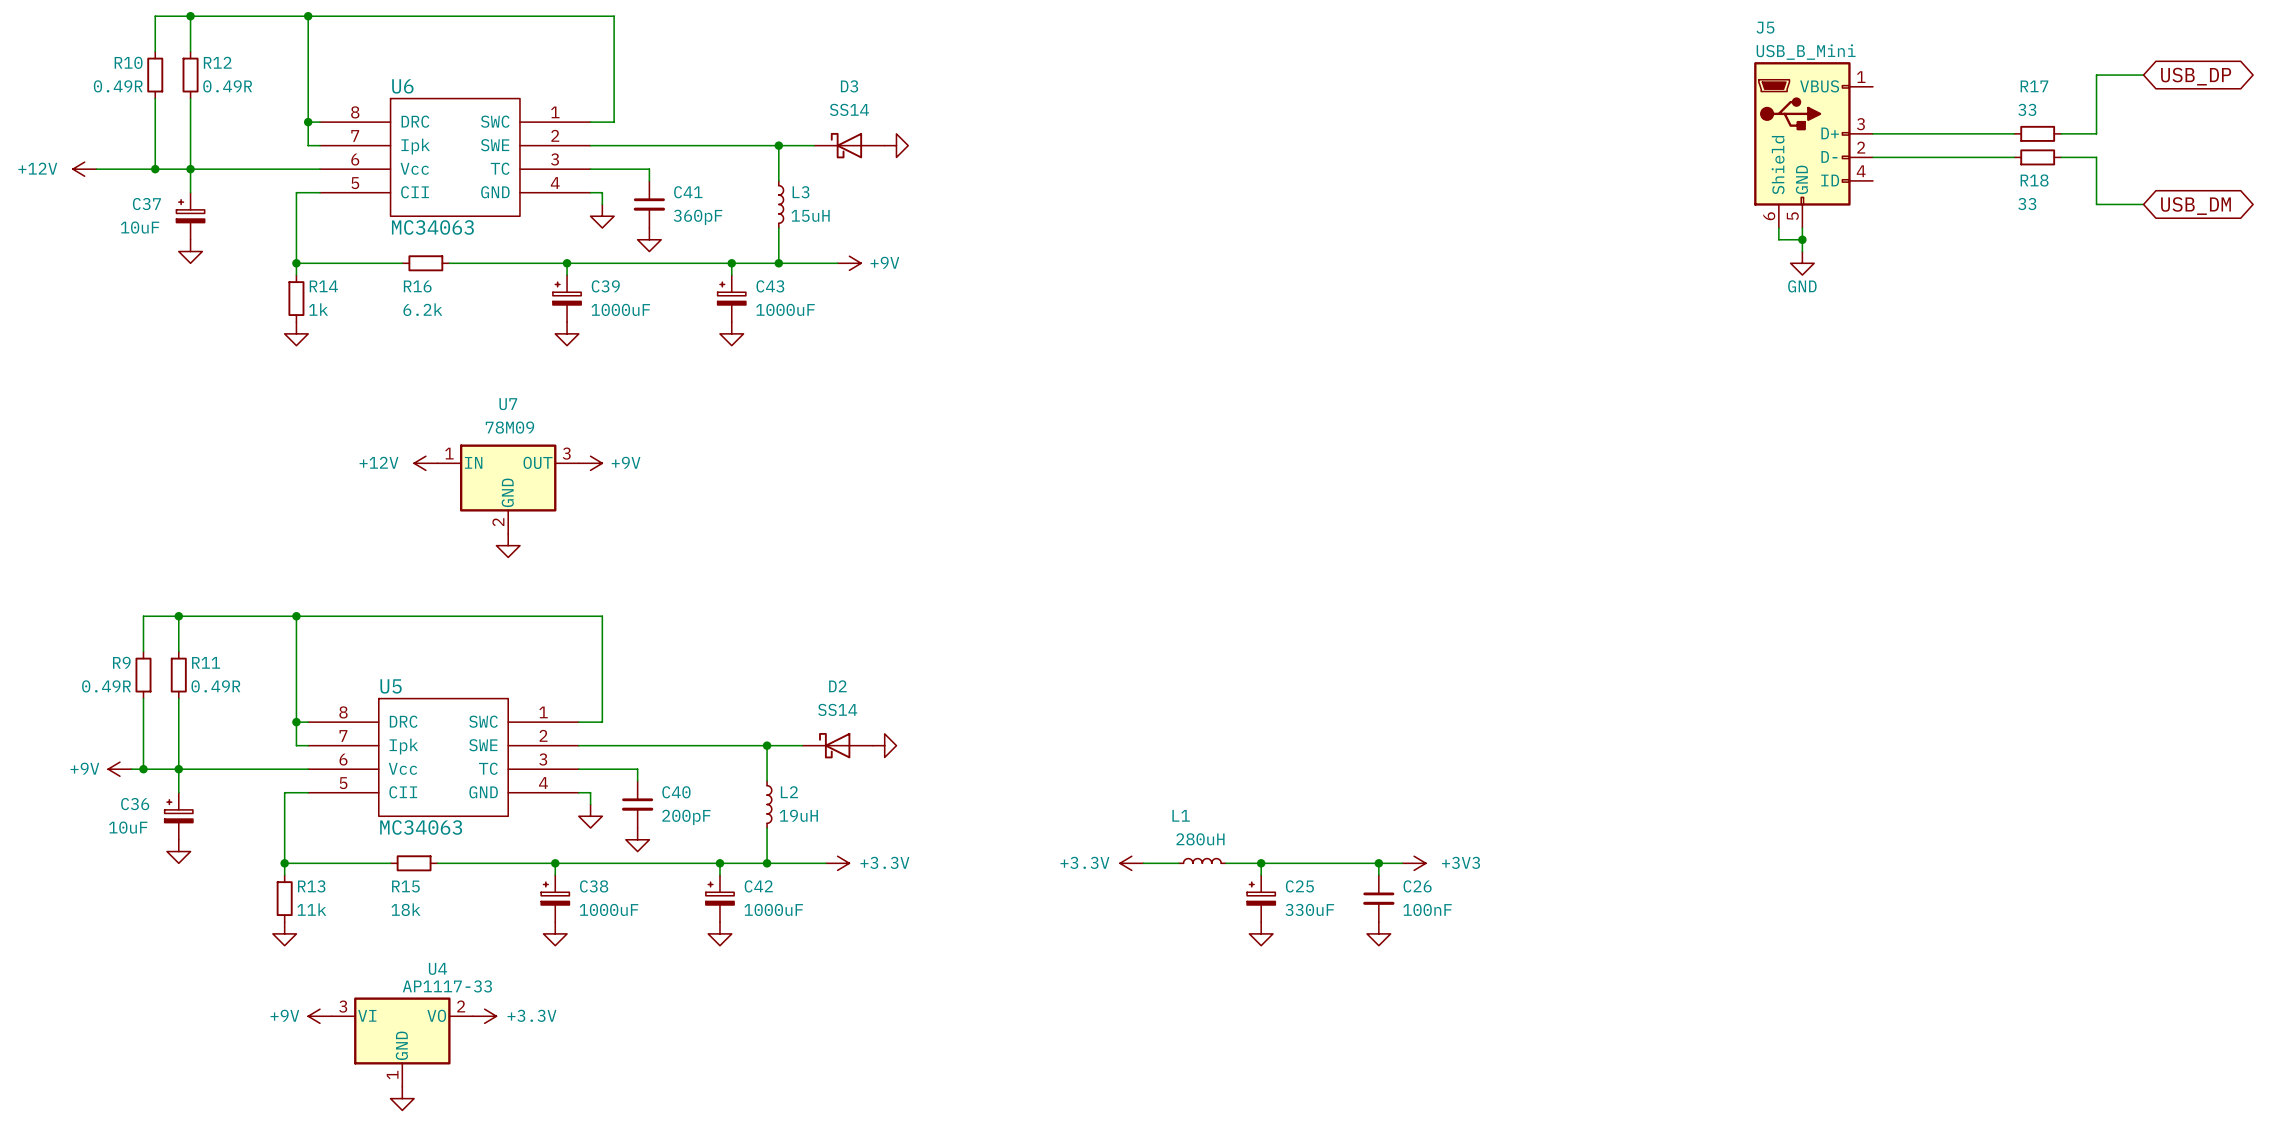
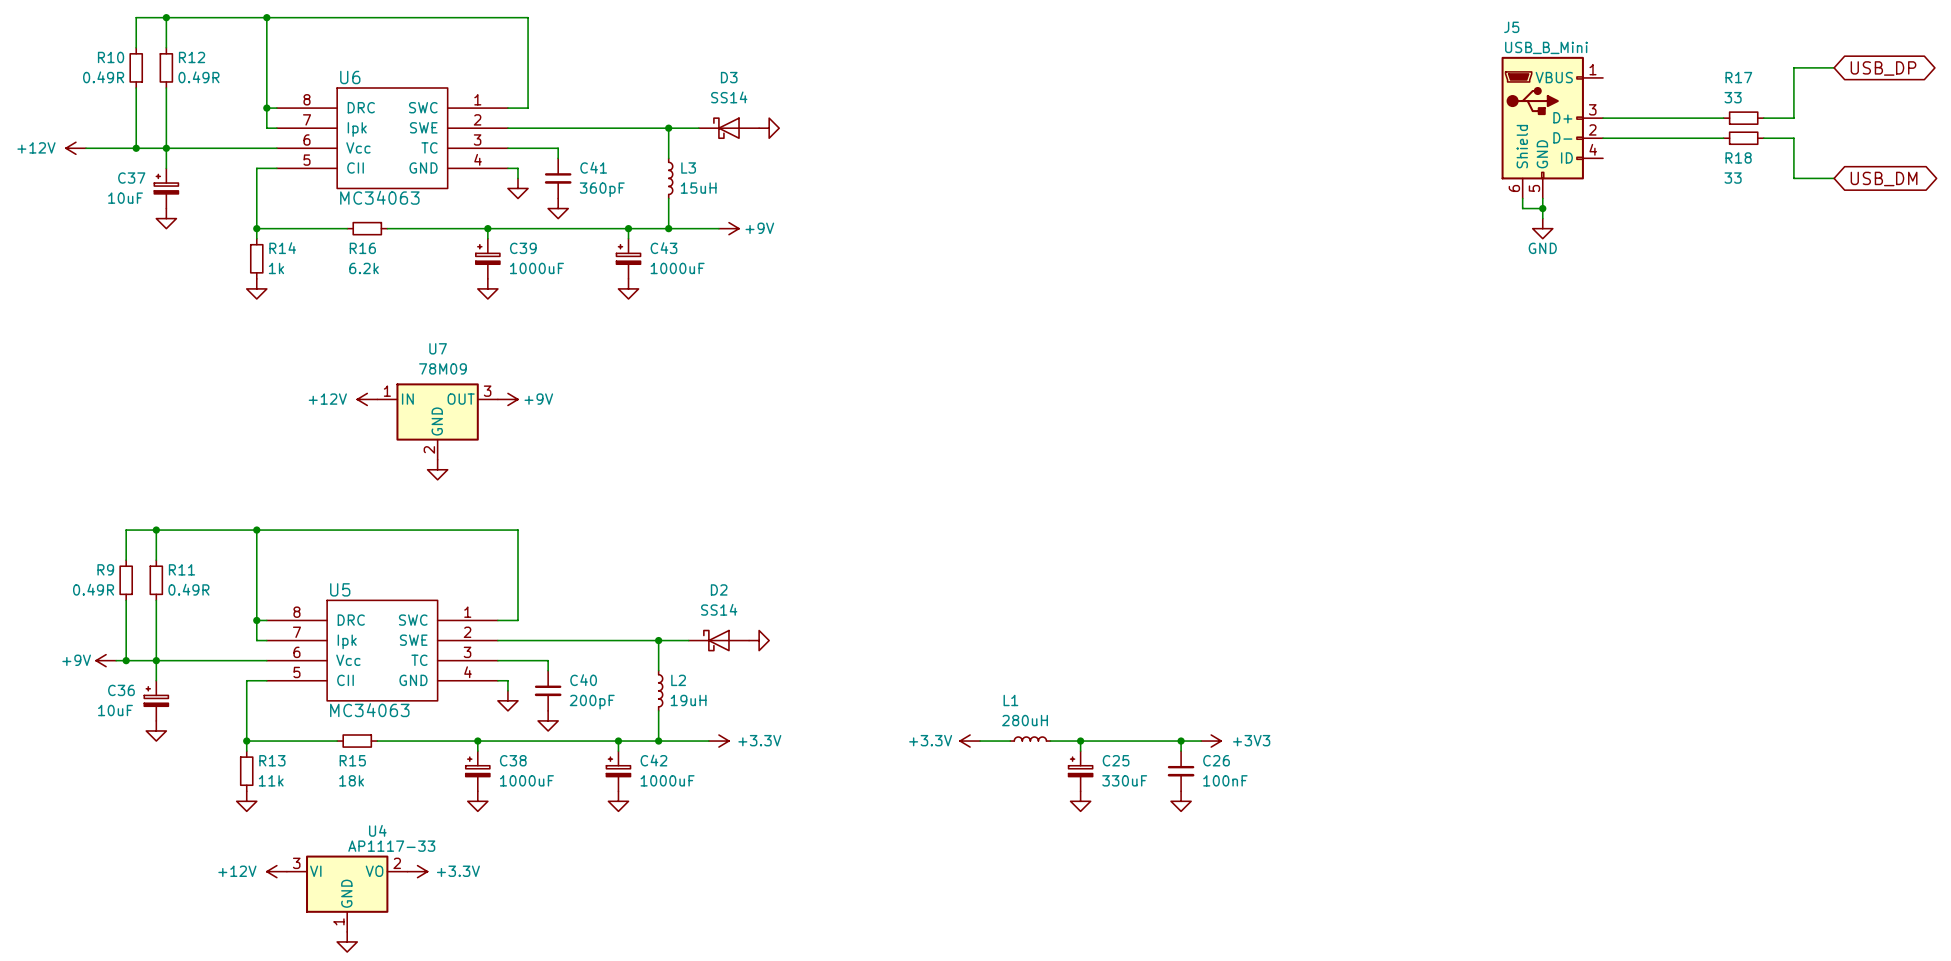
power symbol: +9V (319, 1016) -> +12V (276, 871)

